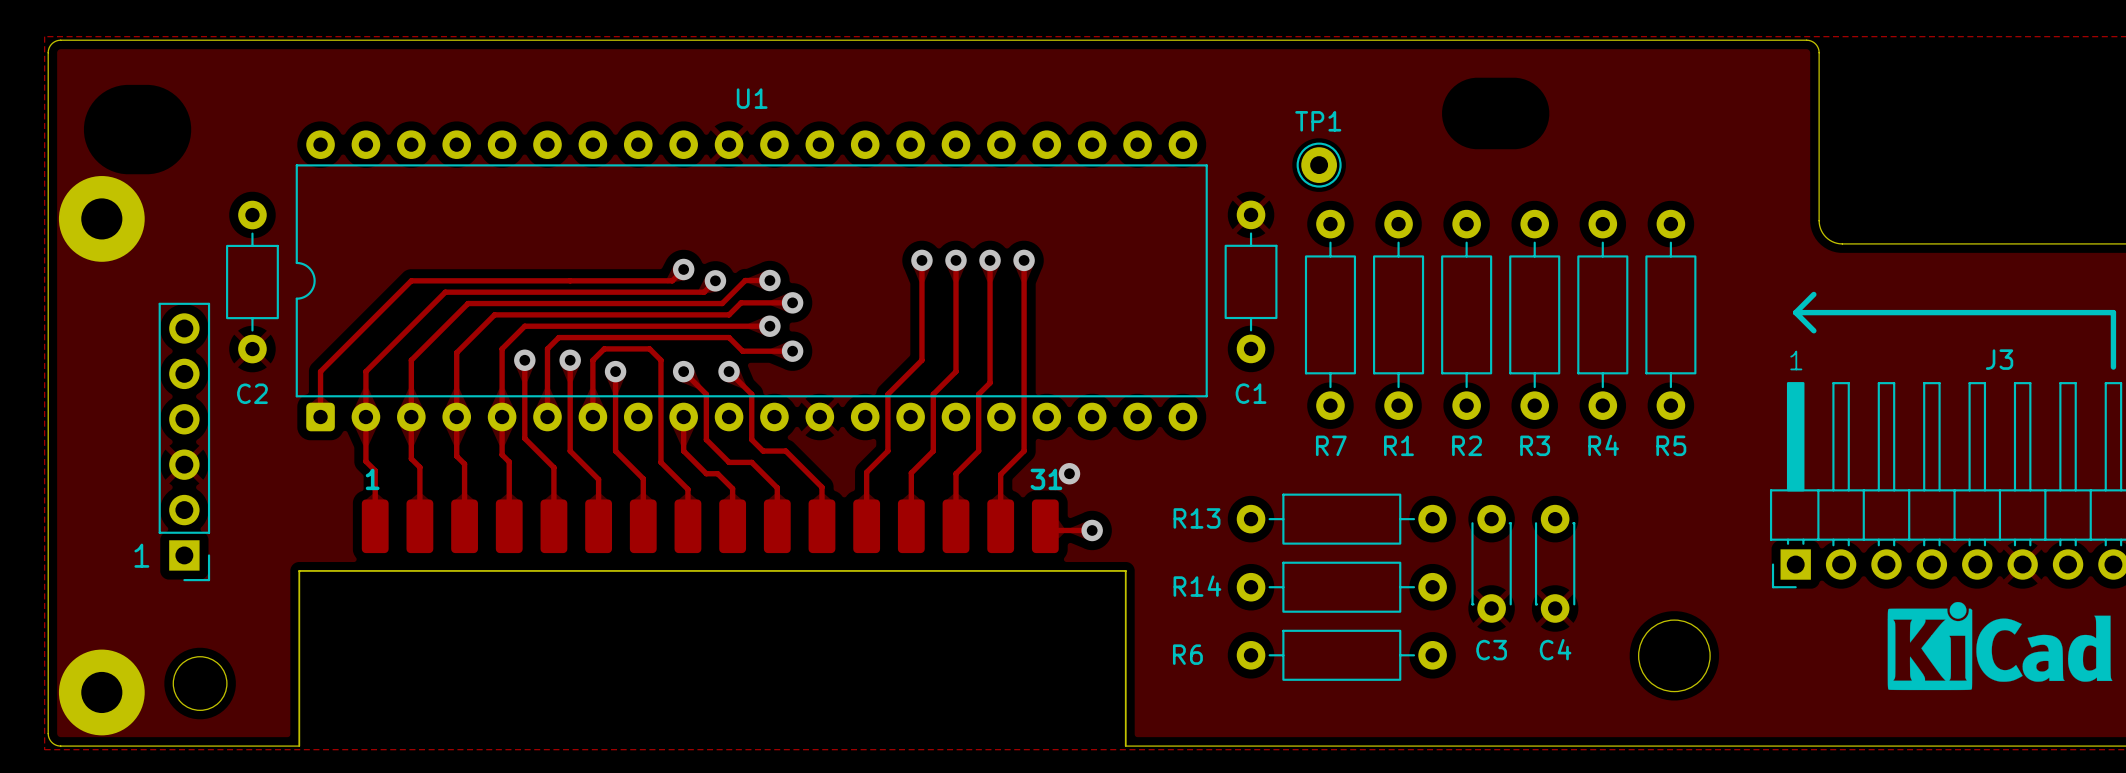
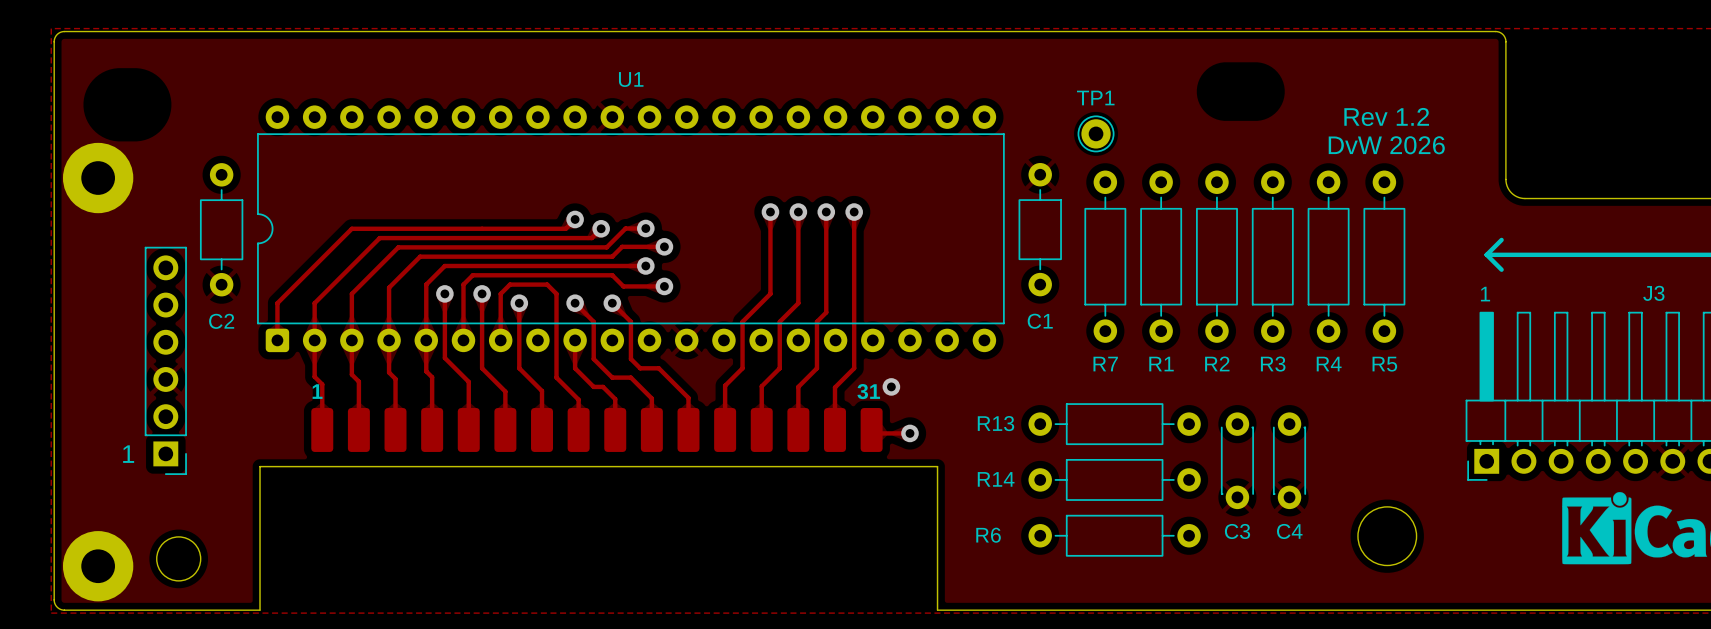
text: none -> Rev 1.2 (1386, 116)
text: none -> DvW 2026 (1386, 145)

